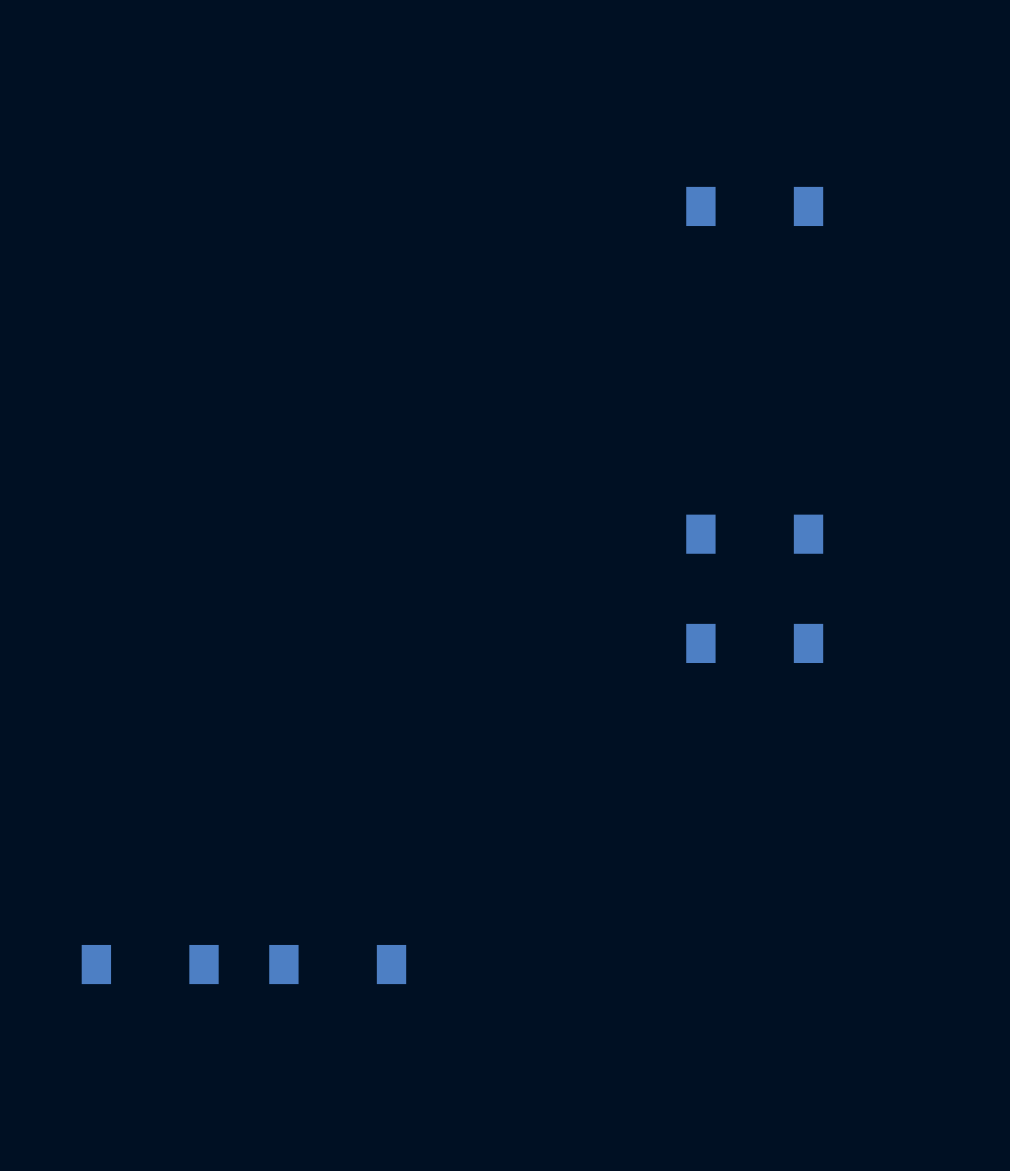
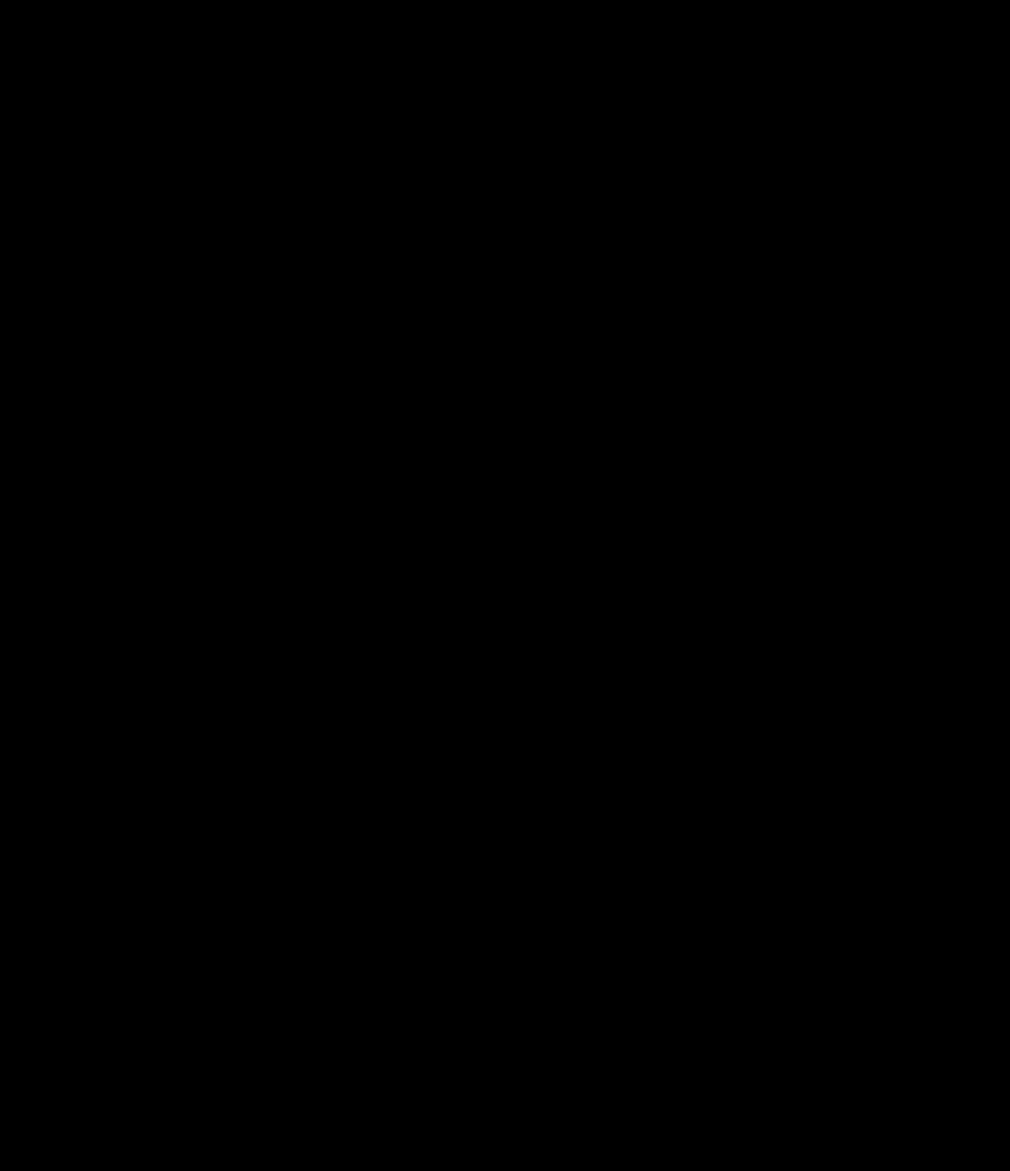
part: (754, 206) -> none
part: (754, 534) -> none
part: (754, 643) -> none
part: (150, 964) -> none
part: (337, 964) -> none

